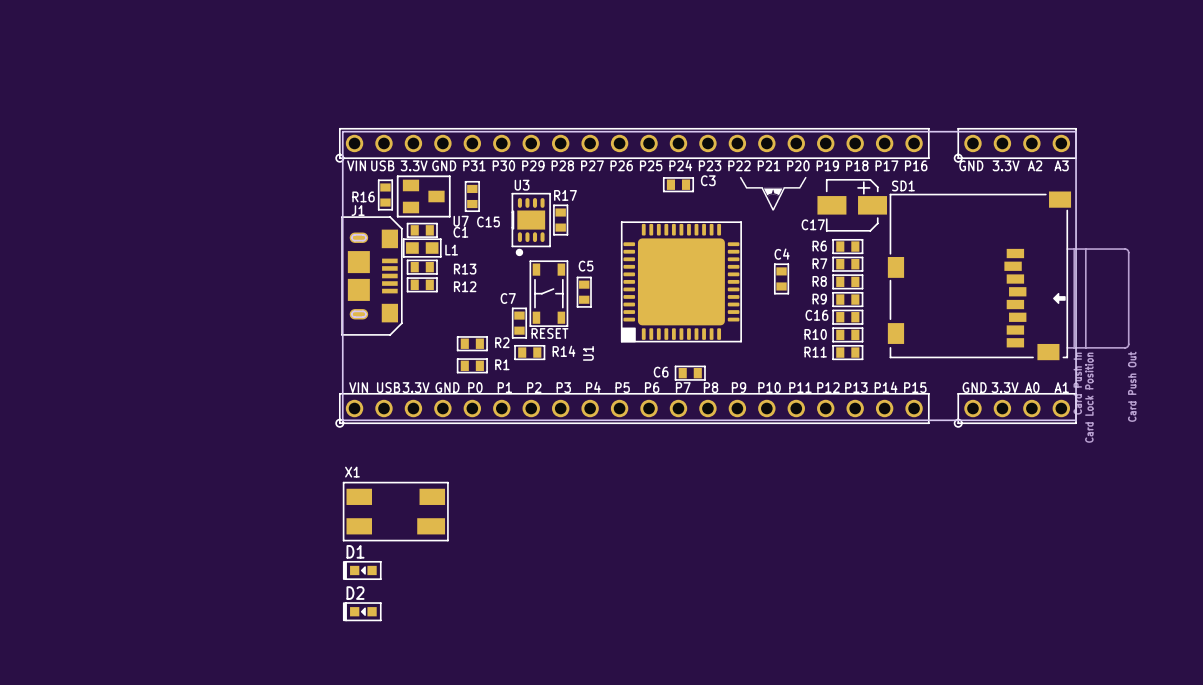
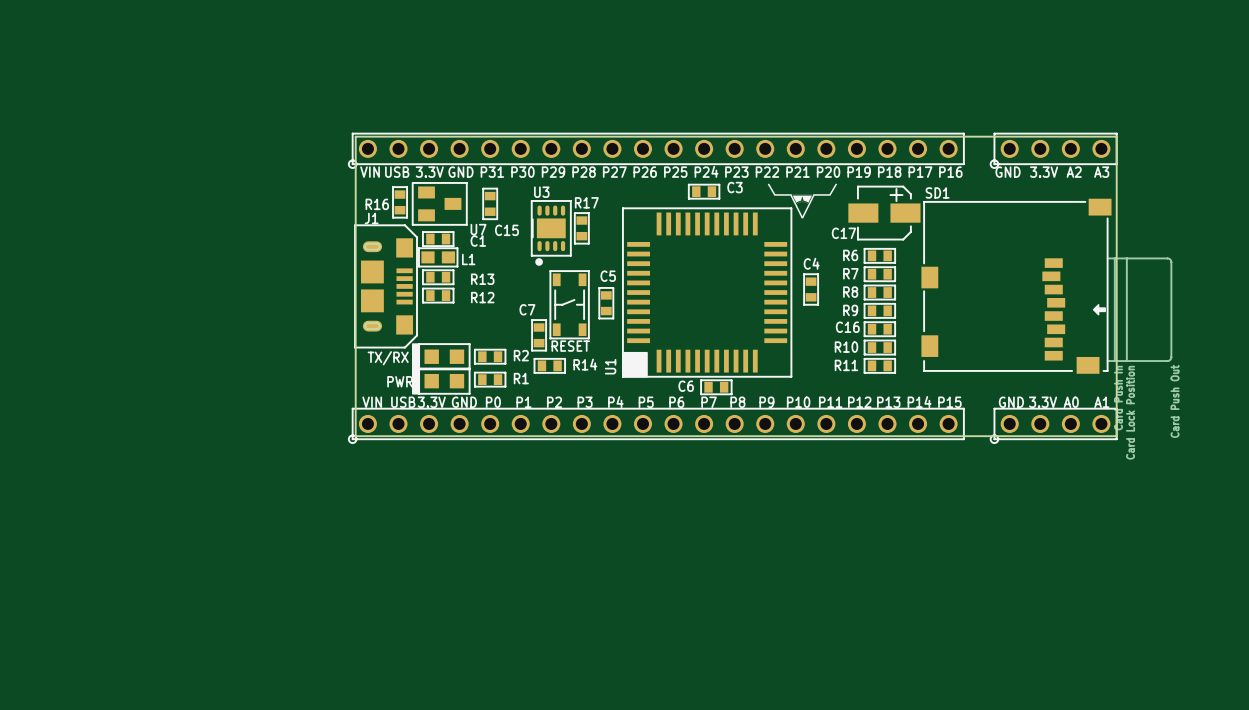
U1 footprint: [620, 221, 742, 343] -> [622, 207, 793, 378]
TX/RX: none -> (441, 356)
PWR: none -> (441, 381)
X1: (395, 511) -> none
D1: (362, 570) -> none
D2: (362, 611) -> none

